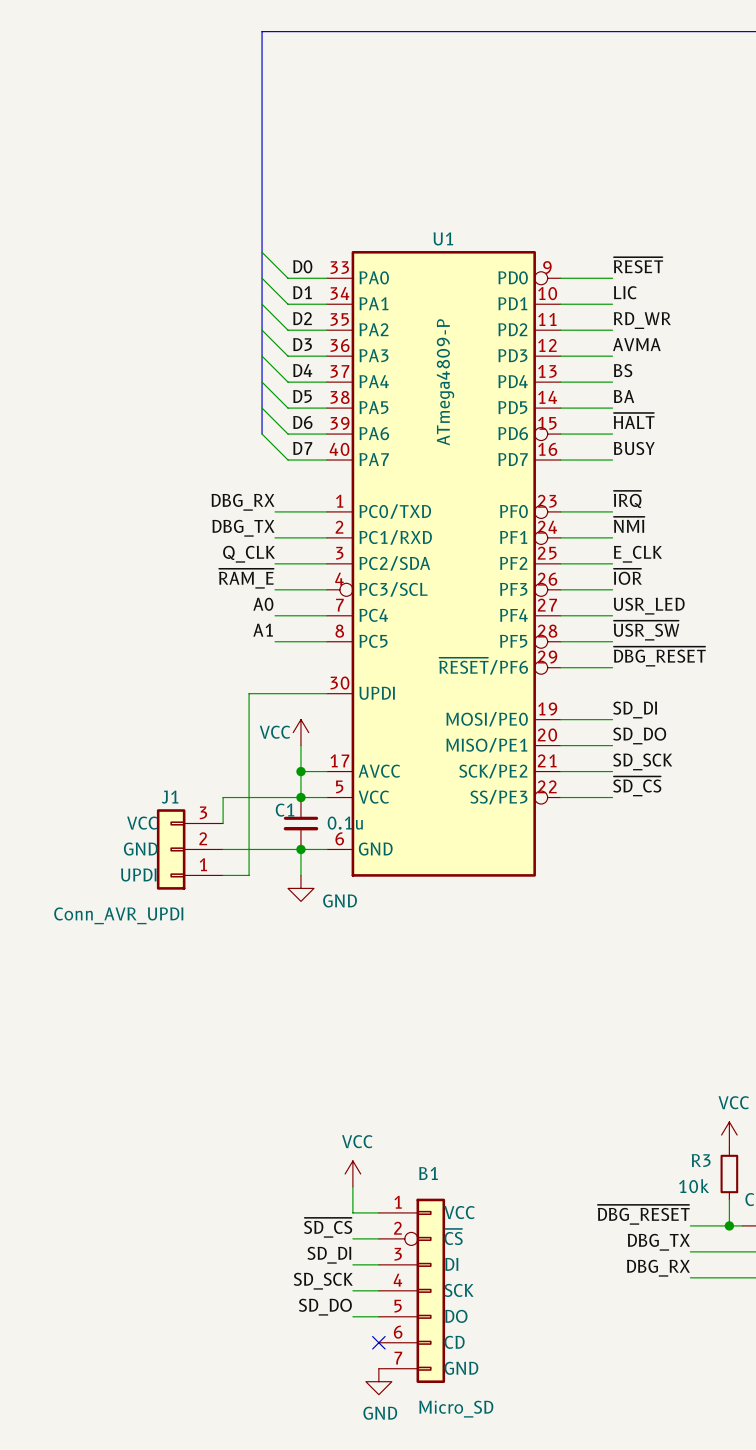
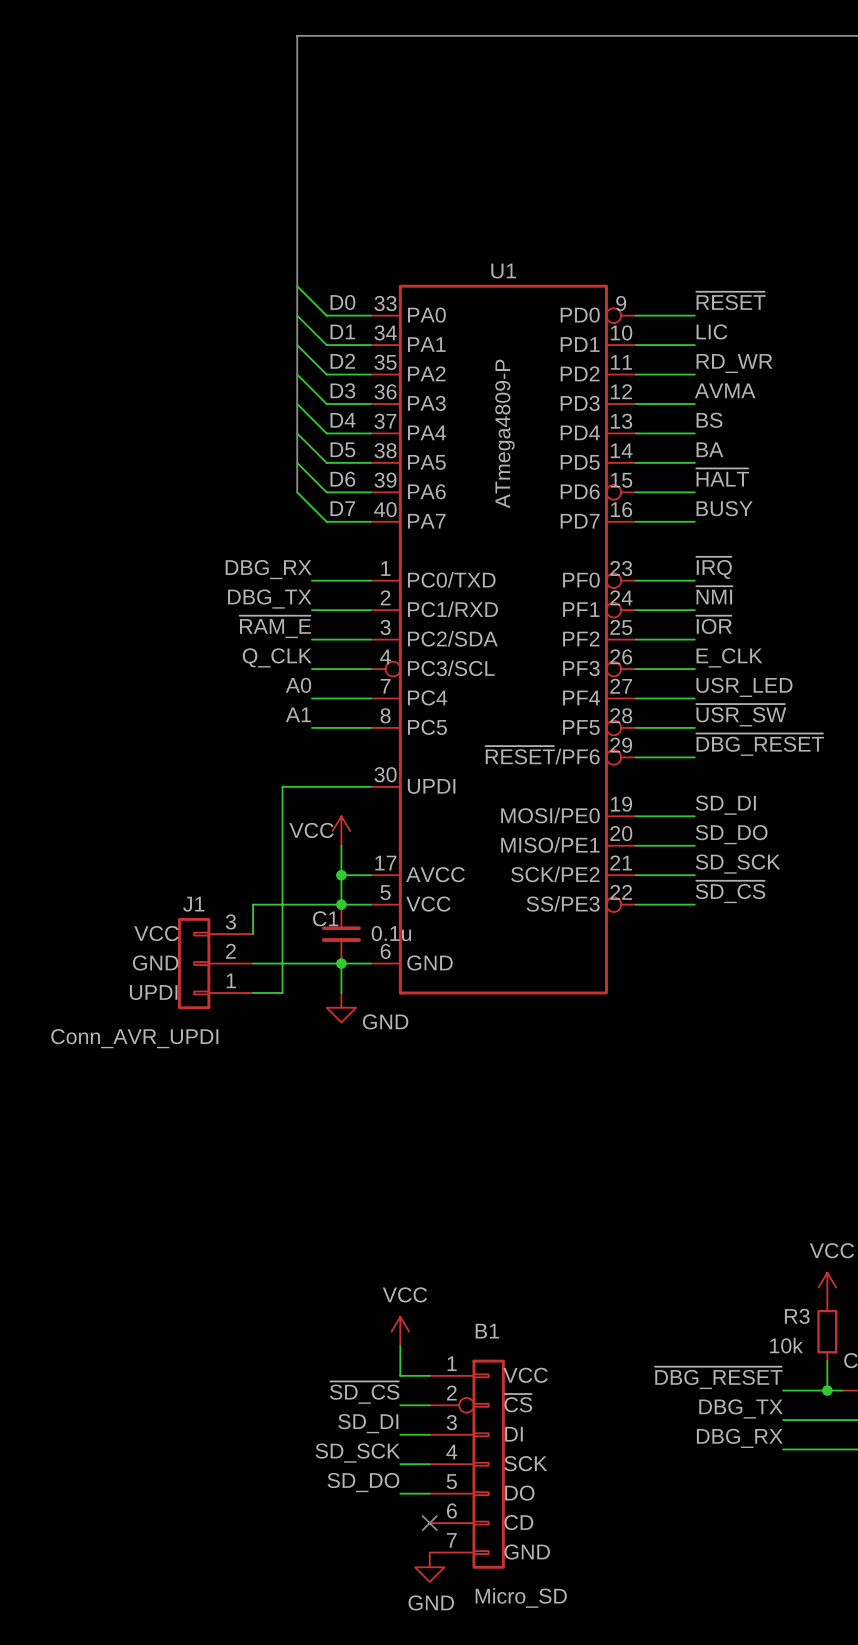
label: Q_CLK (249, 554) -> ~{RAM_E} (275, 626)
label: E_CLK (637, 554) -> ~{IOR} (714, 624)
label: ~{IOR} (627, 576) -> E_CLK (729, 657)
label: ~{RAM_E} (246, 578) -> Q_CLK (277, 657)

